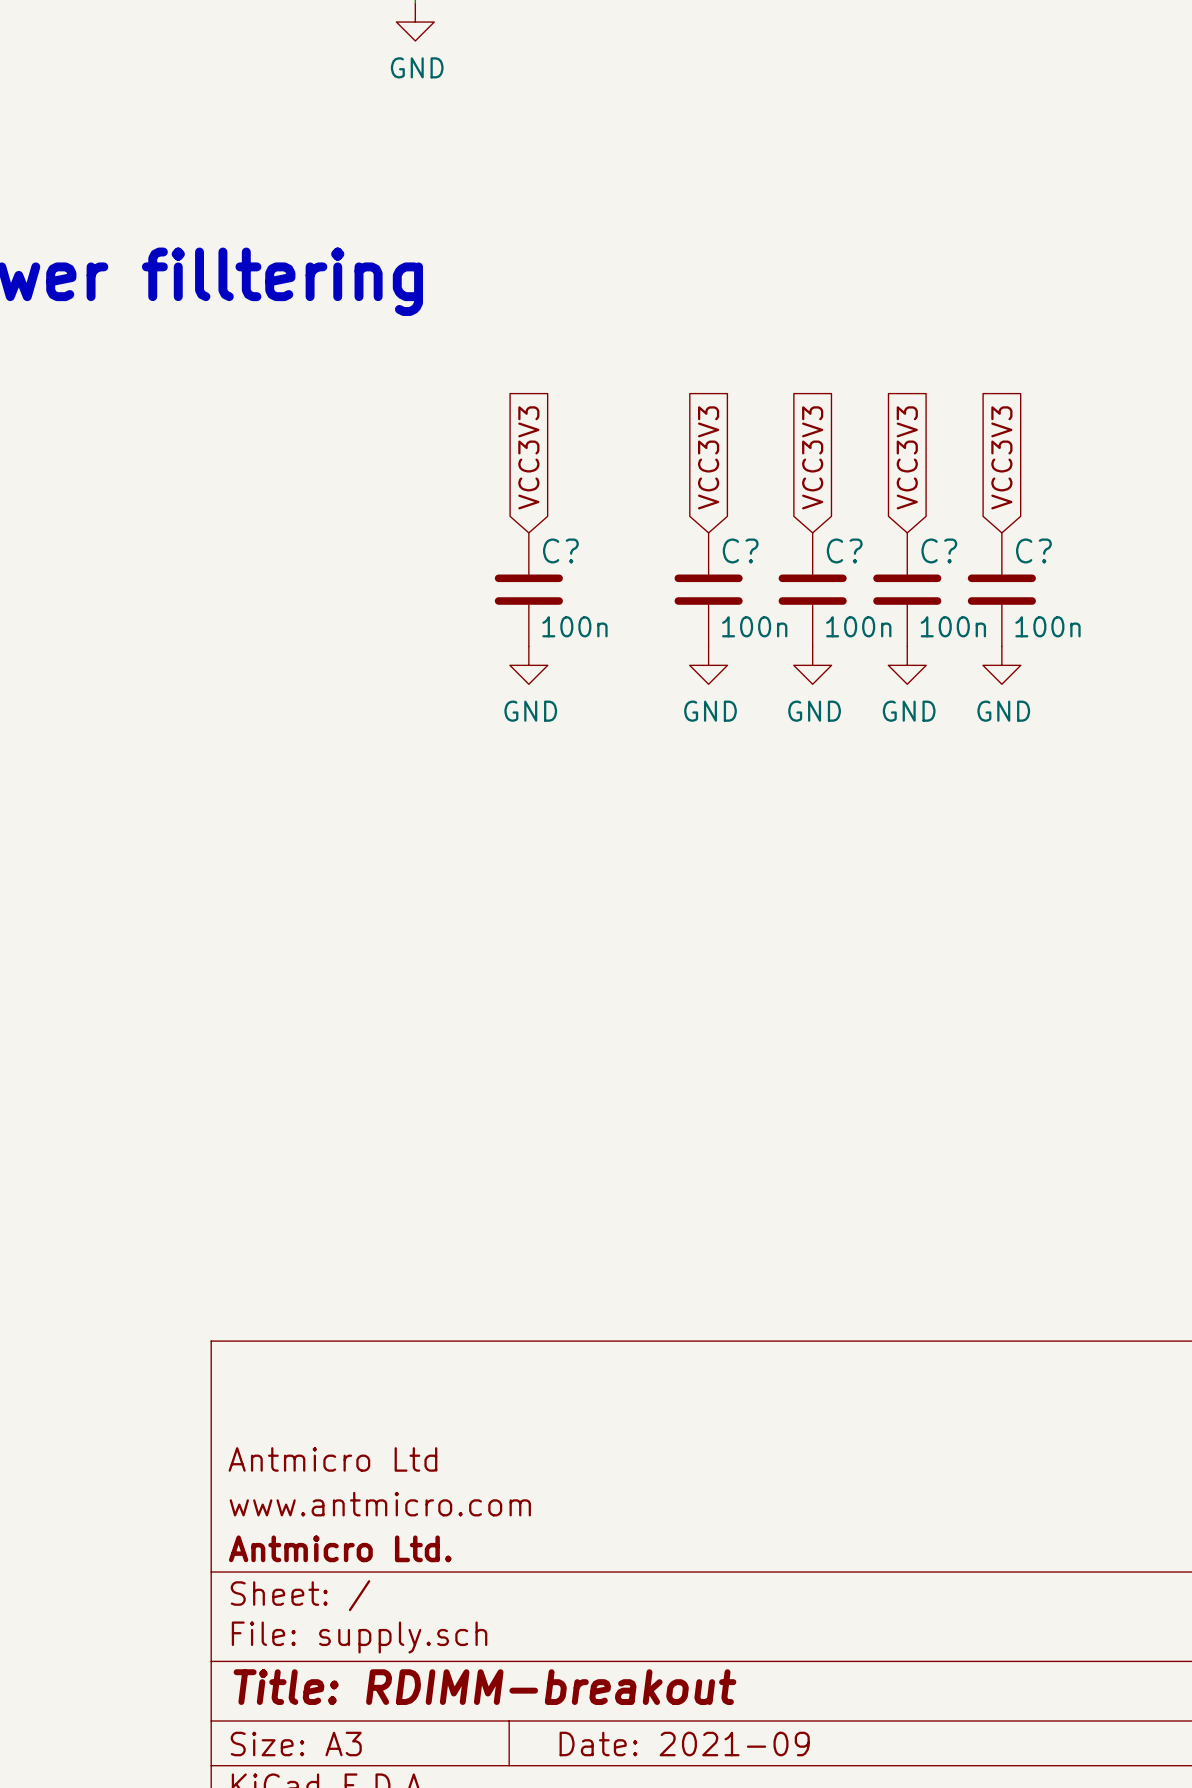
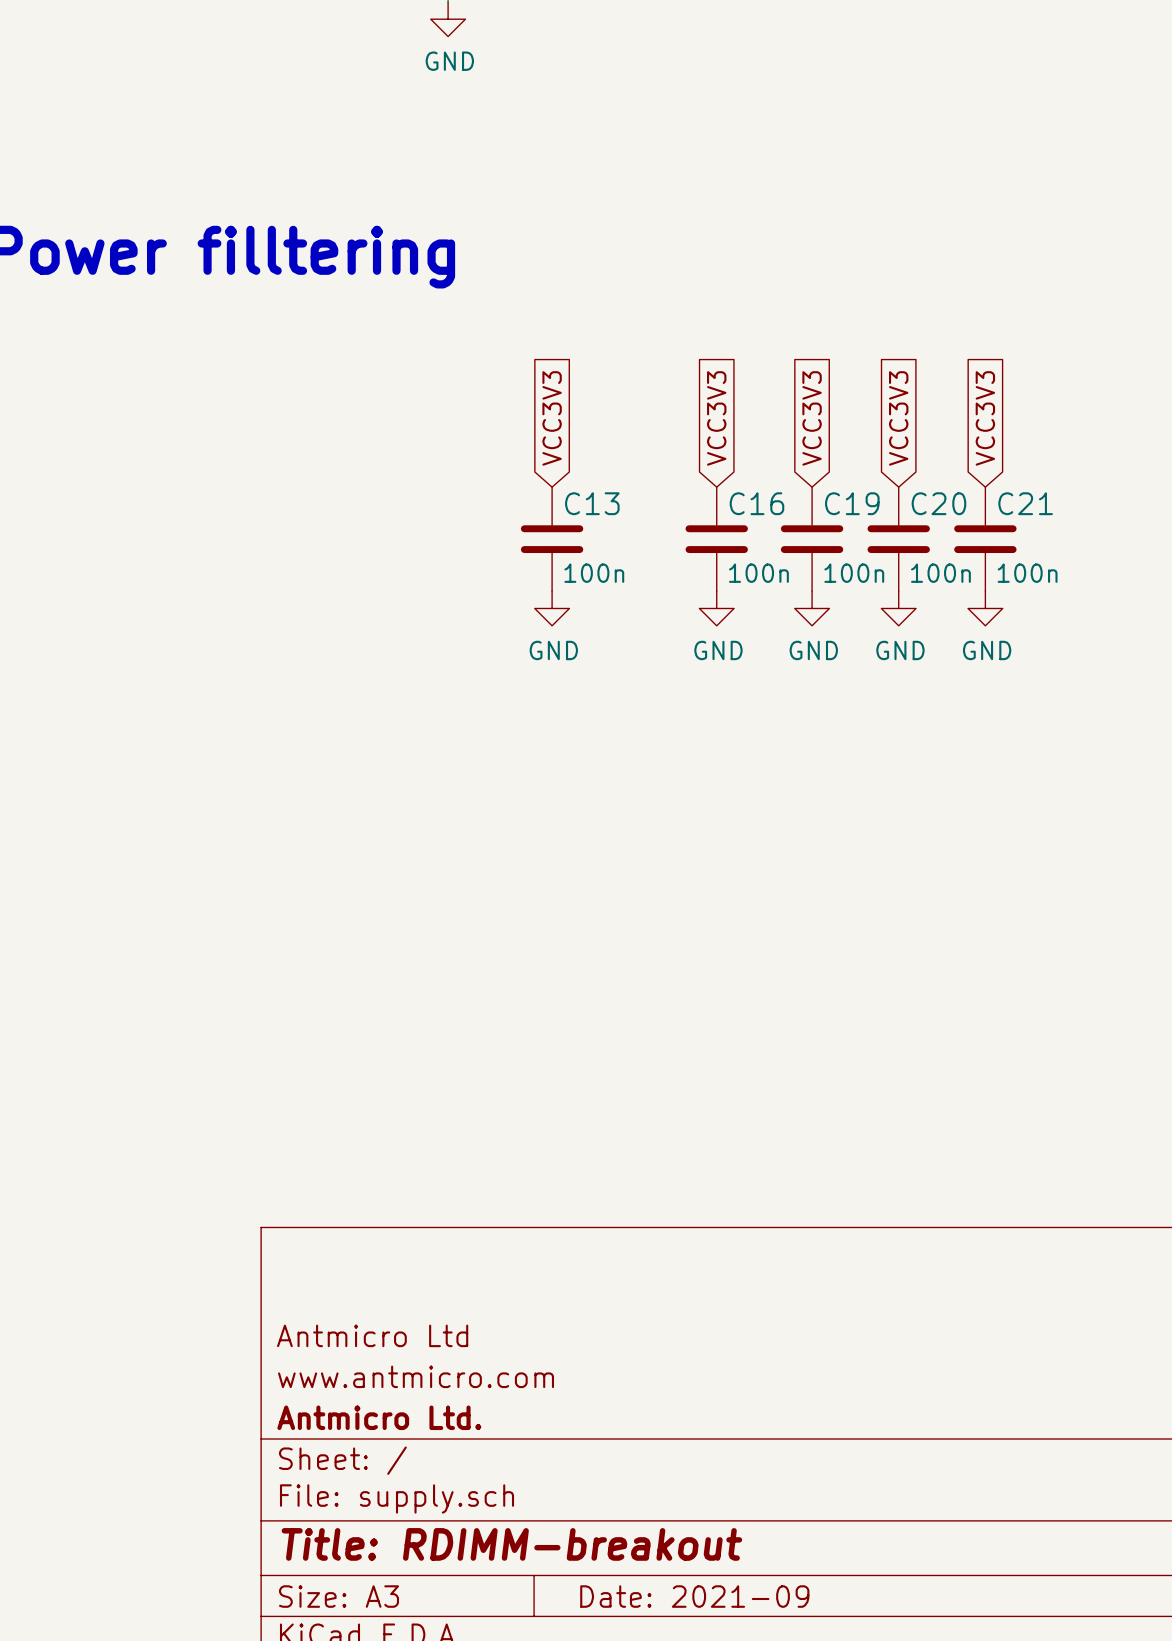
C? name: C? (560, 550) -> C13 (592, 503)
C? name: C? (740, 550) -> C16 (756, 503)
C? name: C? (844, 550) -> C19 (852, 503)
C? name: C? (939, 550) -> C20 (938, 503)
C? name: C? (1033, 550) -> C21 (1025, 503)

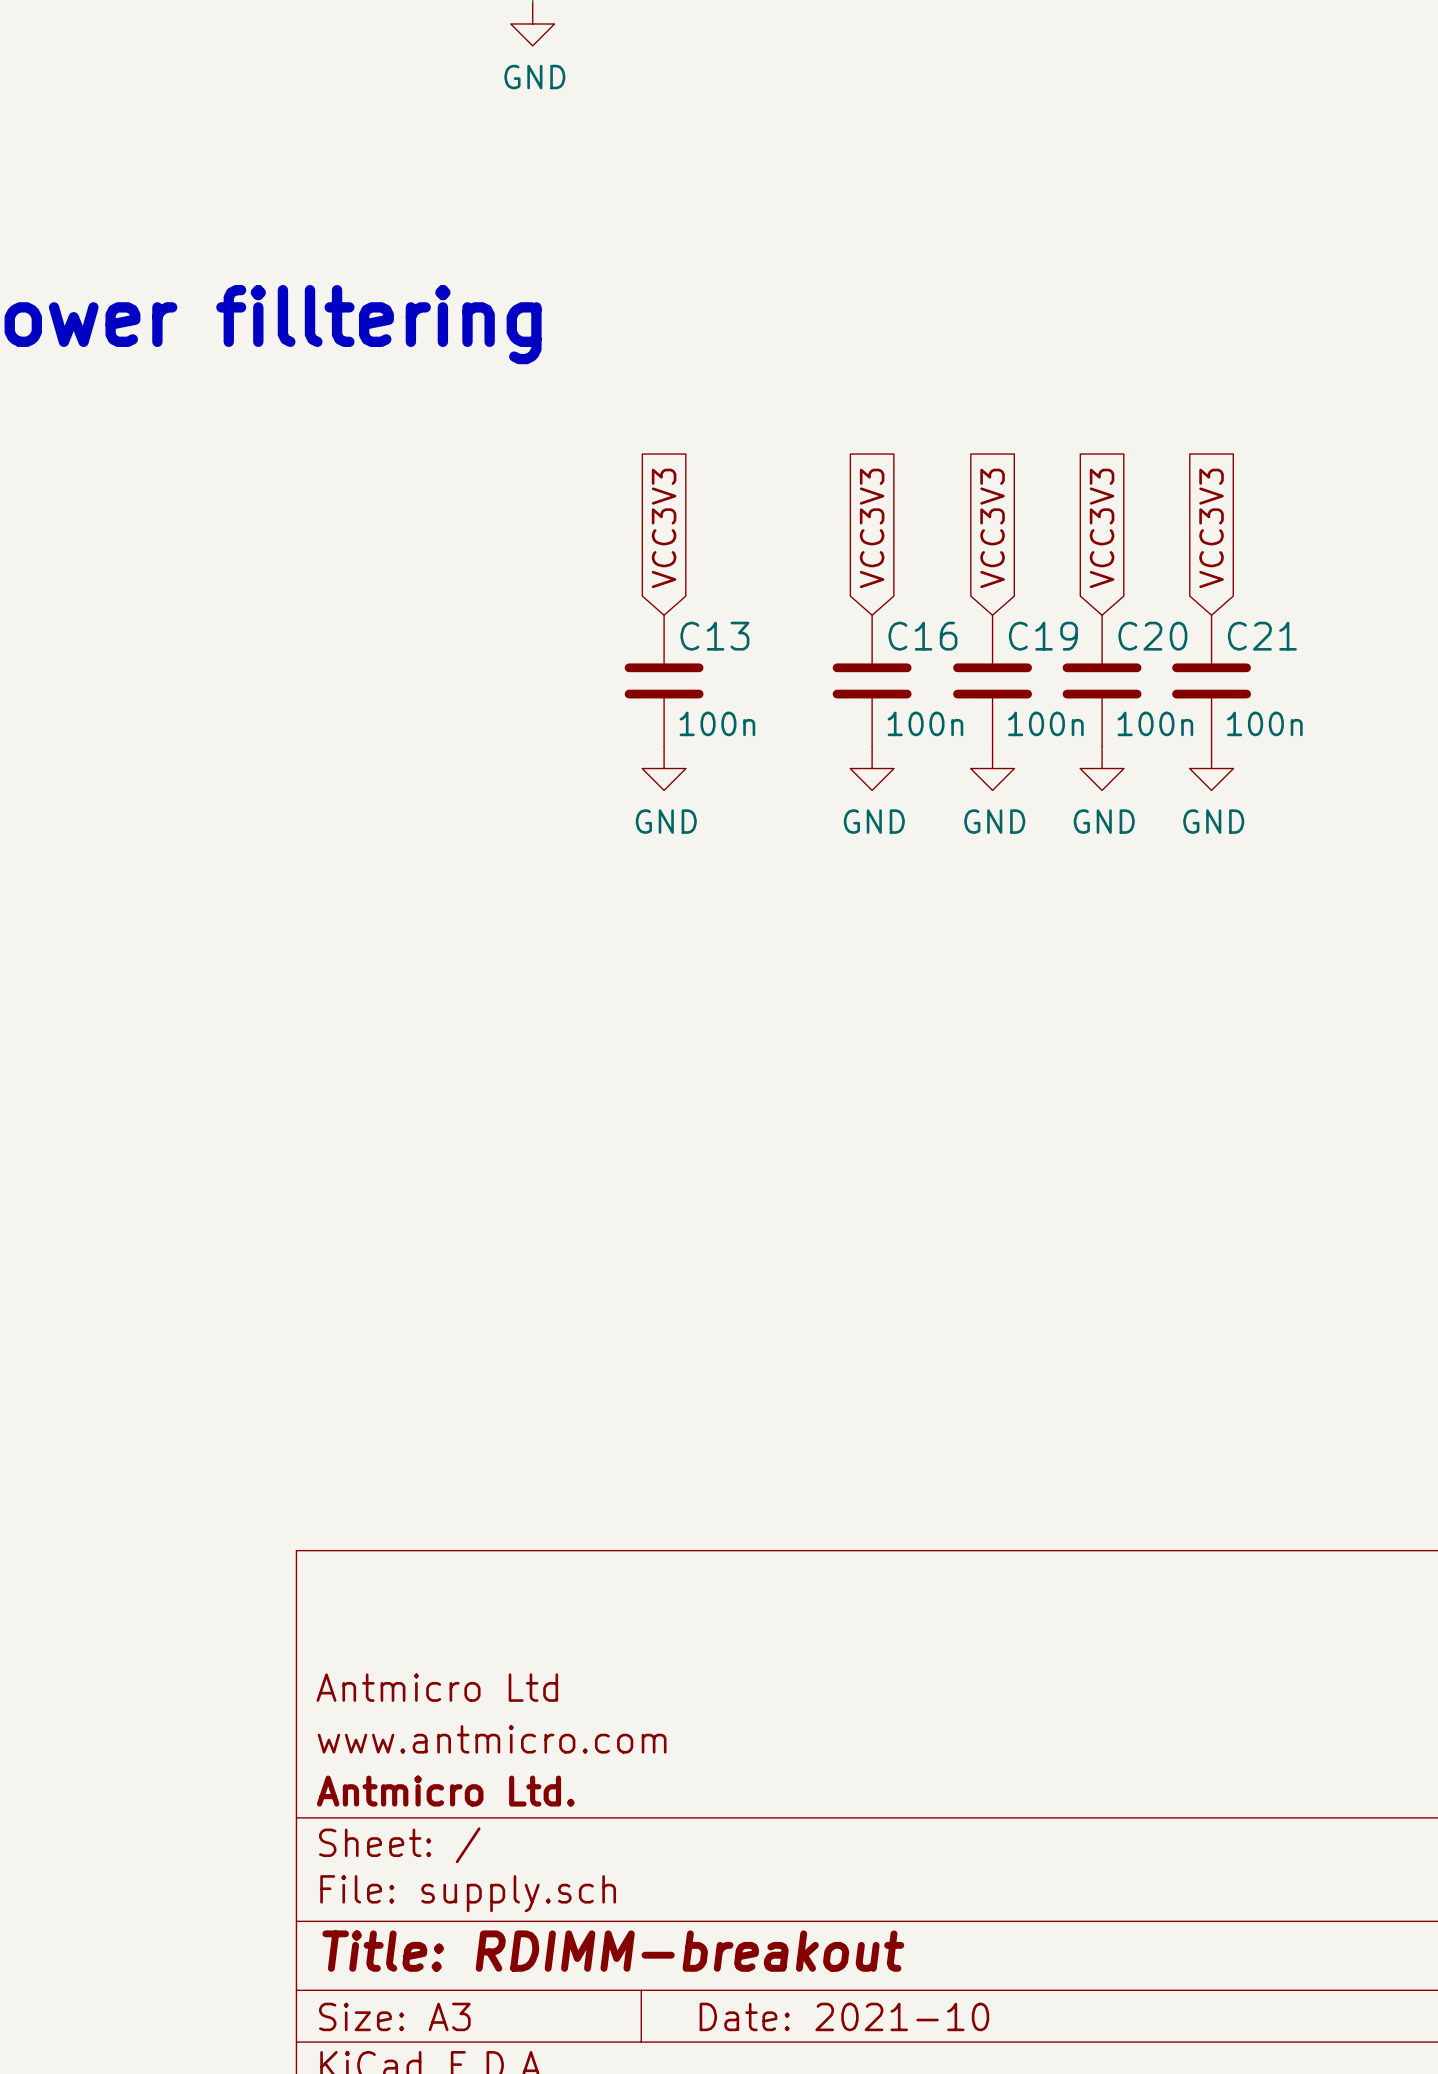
title block: Date: 2021-09 (694, 1596) -> Date: 2021-10 (844, 2016)

